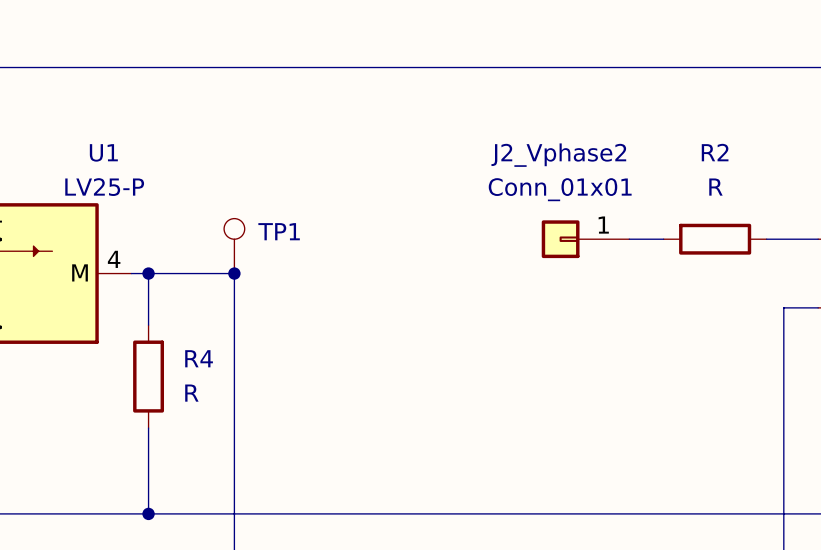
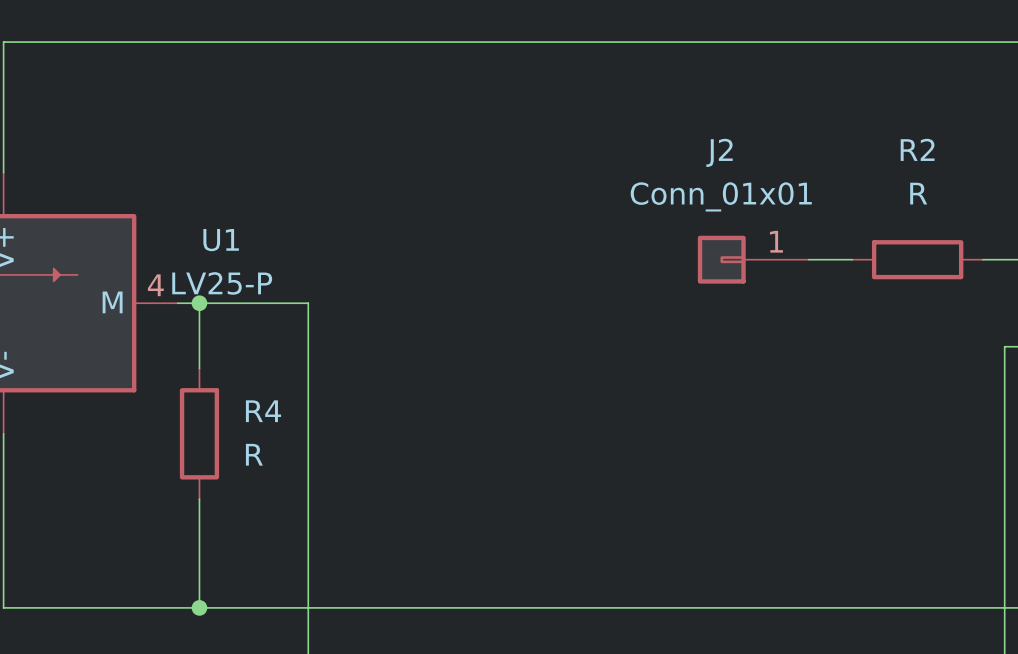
U1 name position: U1 (103, 152) -> U1 (221, 240)
J2_Vphase2 name: J2_Vphase2 (558, 155) -> J2 (719, 152)
U1 value position: LV25-P (104, 187) -> LV25-P (222, 283)
TP1: (234, 246) -> none
junction: (234, 273) -> none

